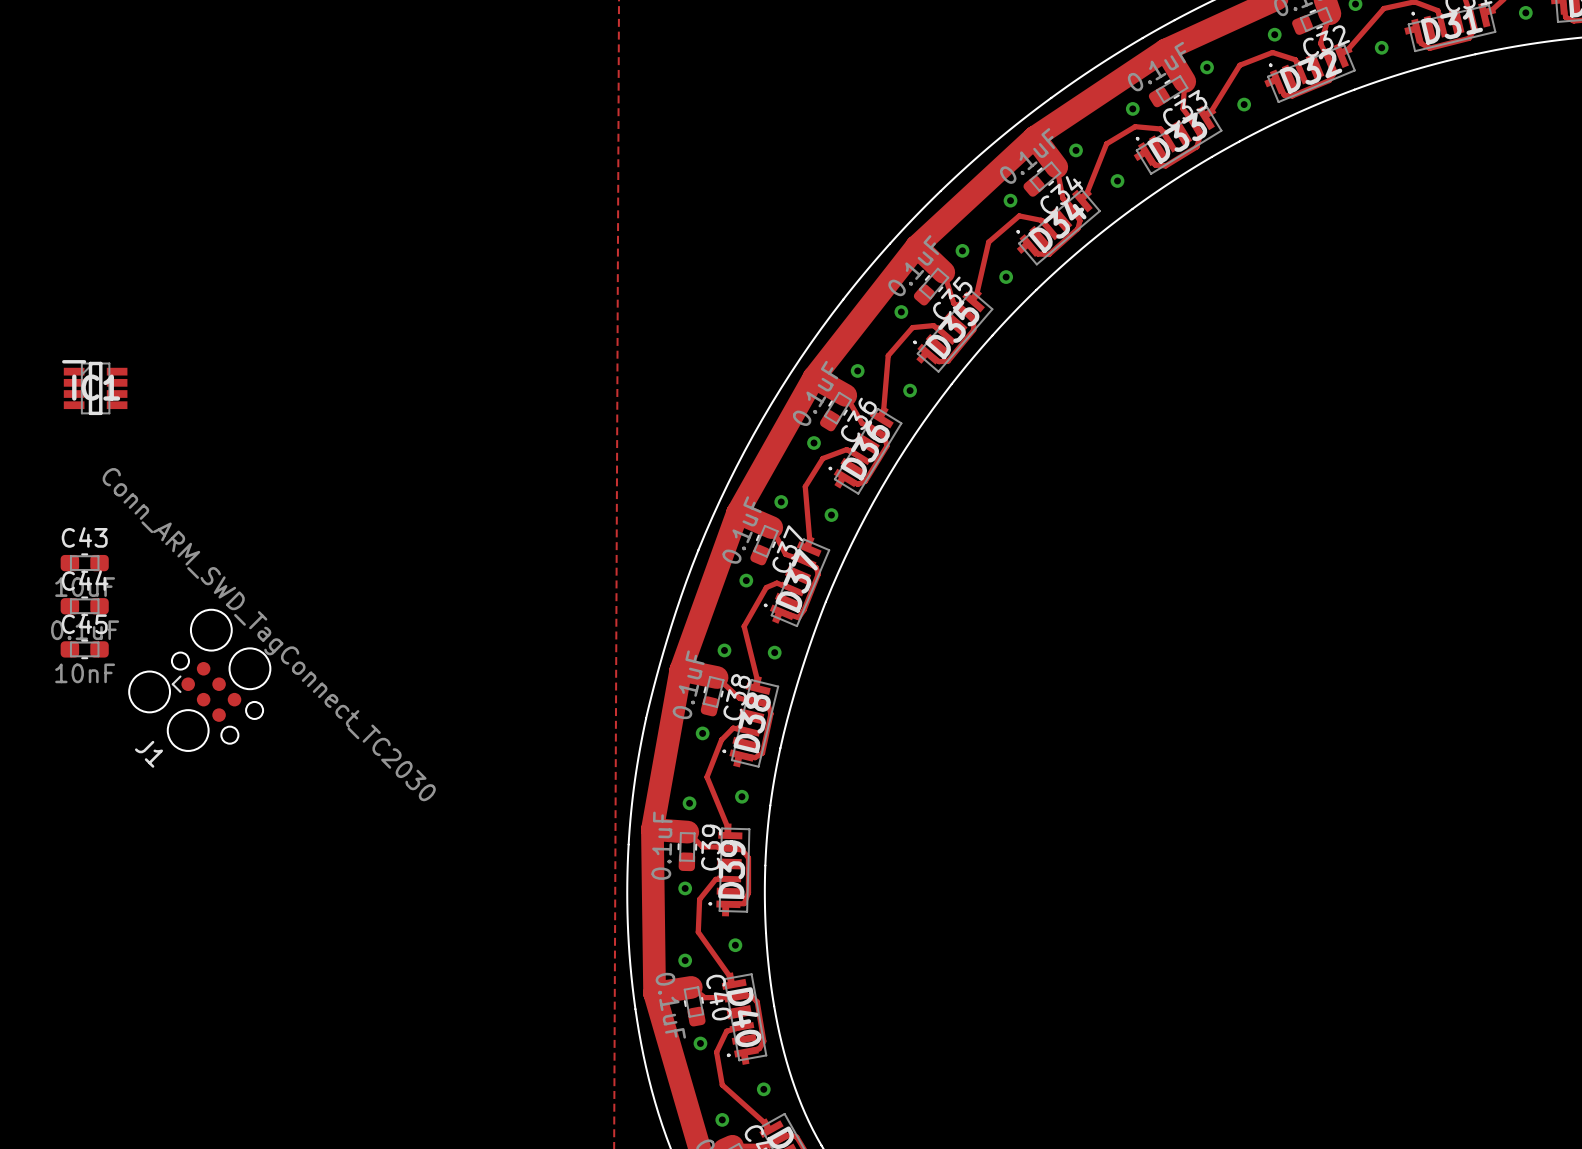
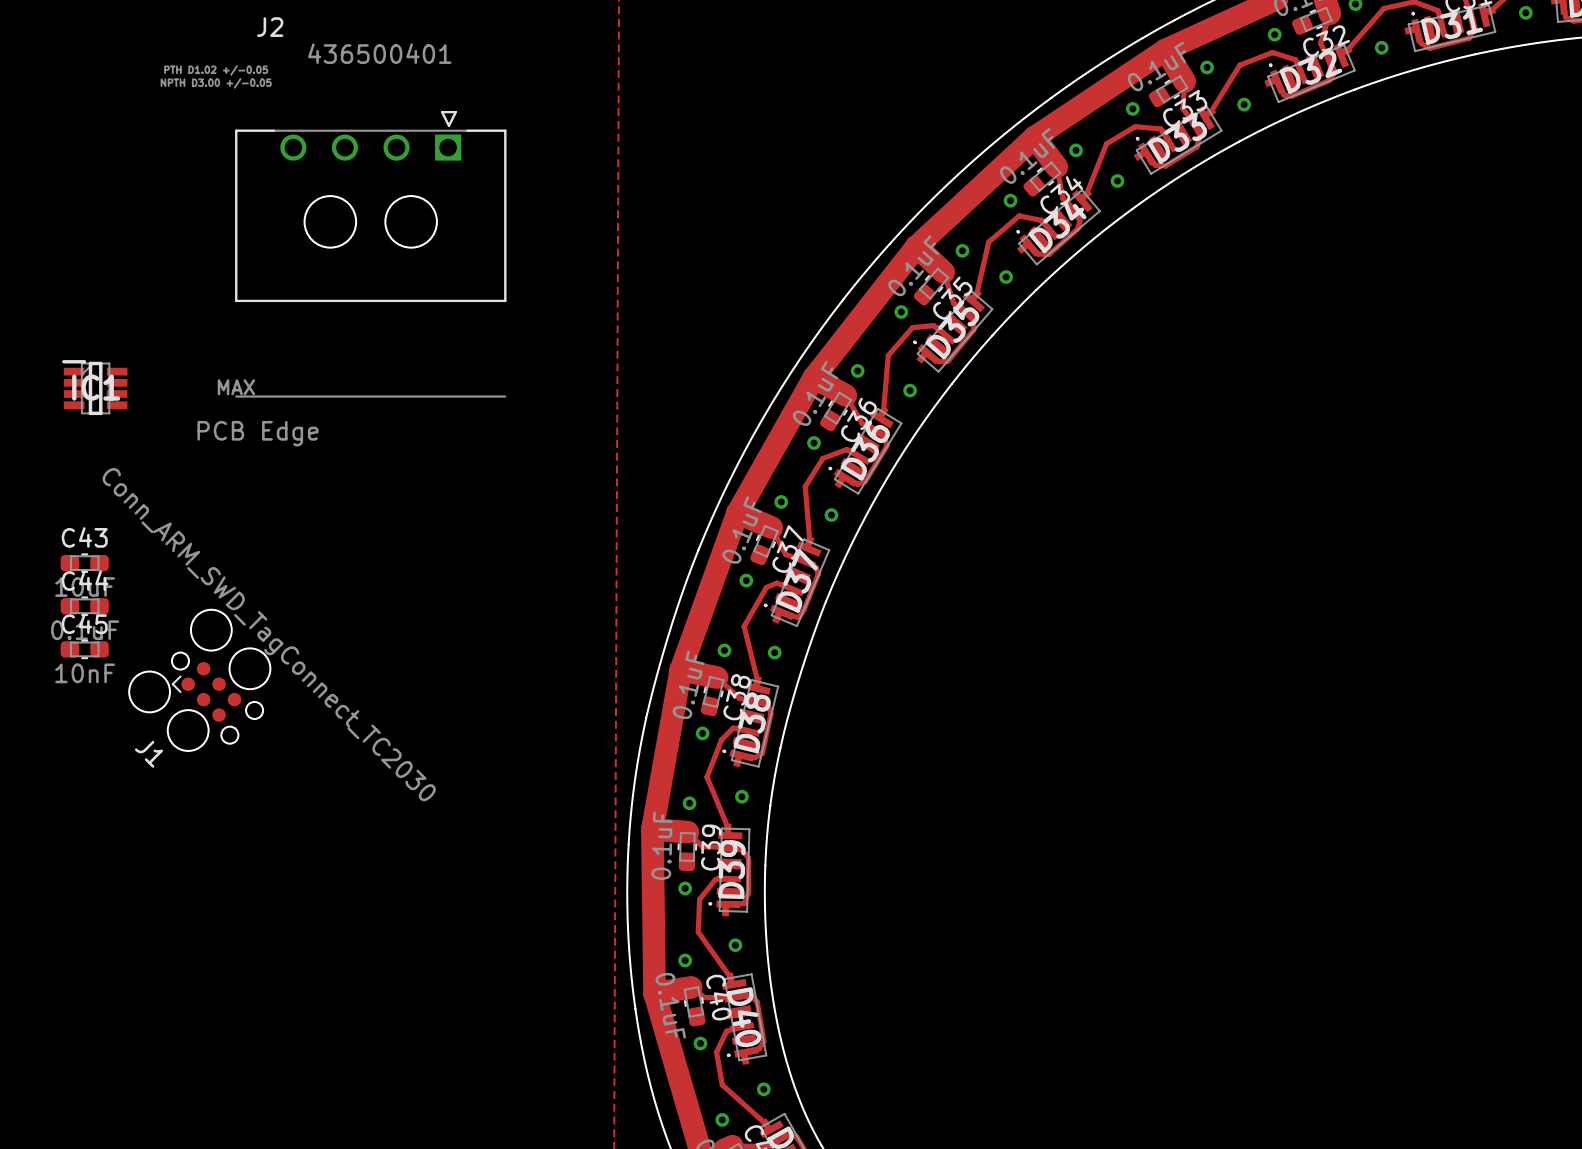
J2: none -> 436500401 (370, 254)

